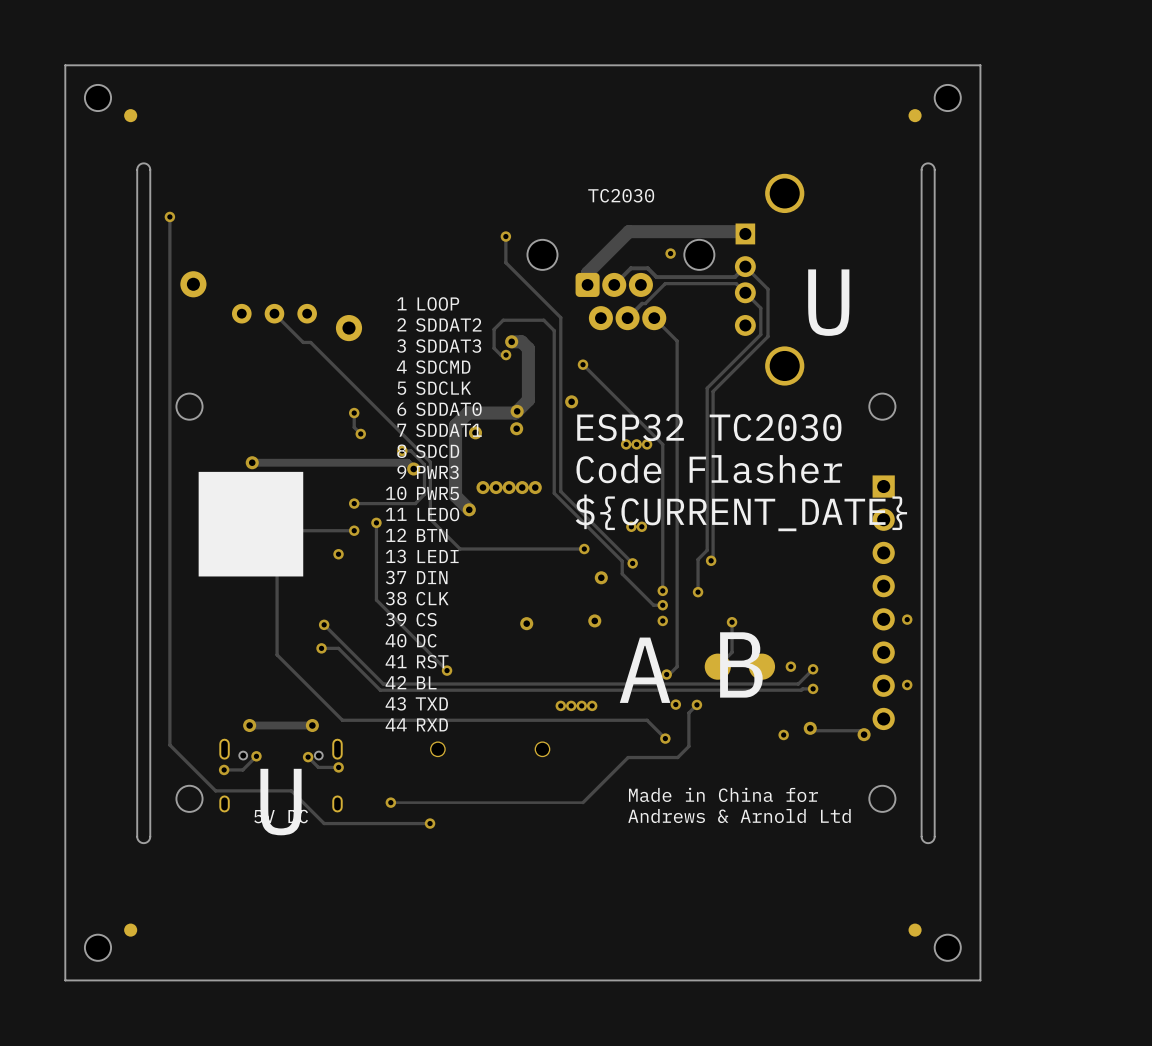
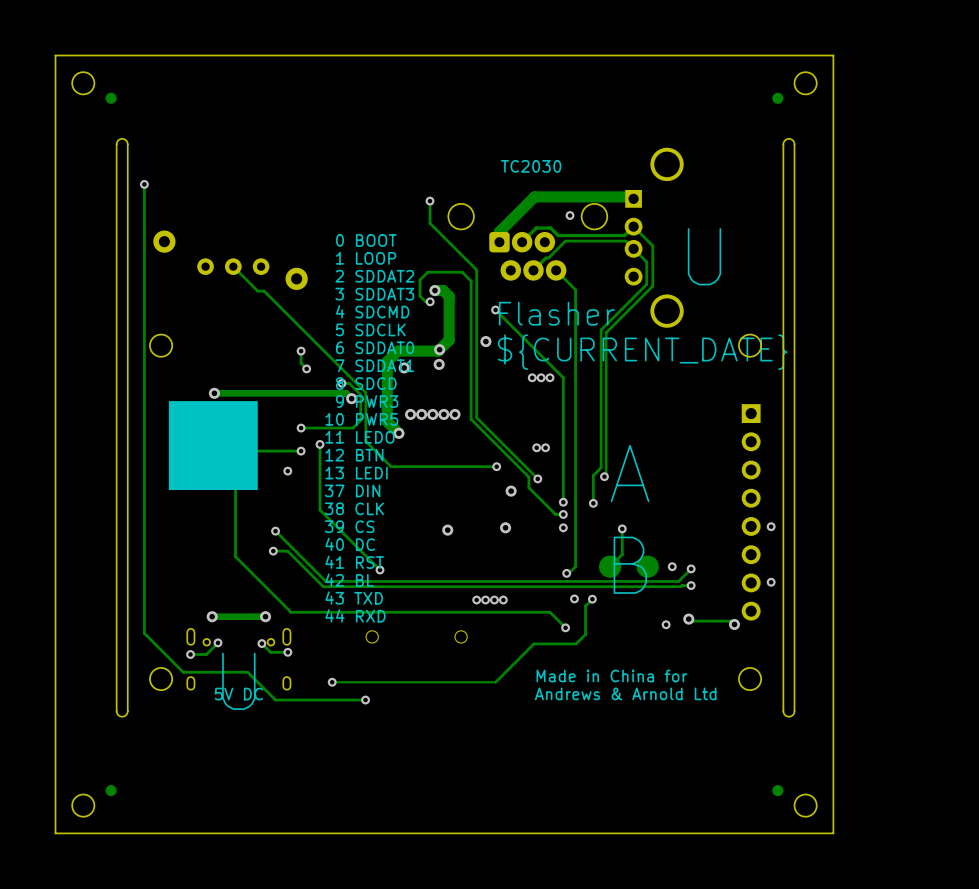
text: none -> 0 (339, 240)
text: none -> BOOT (376, 240)
text: none -> Flasher (556, 313)
text: ESP32 TC2030 (709, 427) -> none
text: Code Flasher (709, 469) -> none
text position: ${CURRENT_DATE} (741, 512) -> ${CURRENT_DATE} (642, 352)
text position: A (645, 670) -> A (630, 473)

